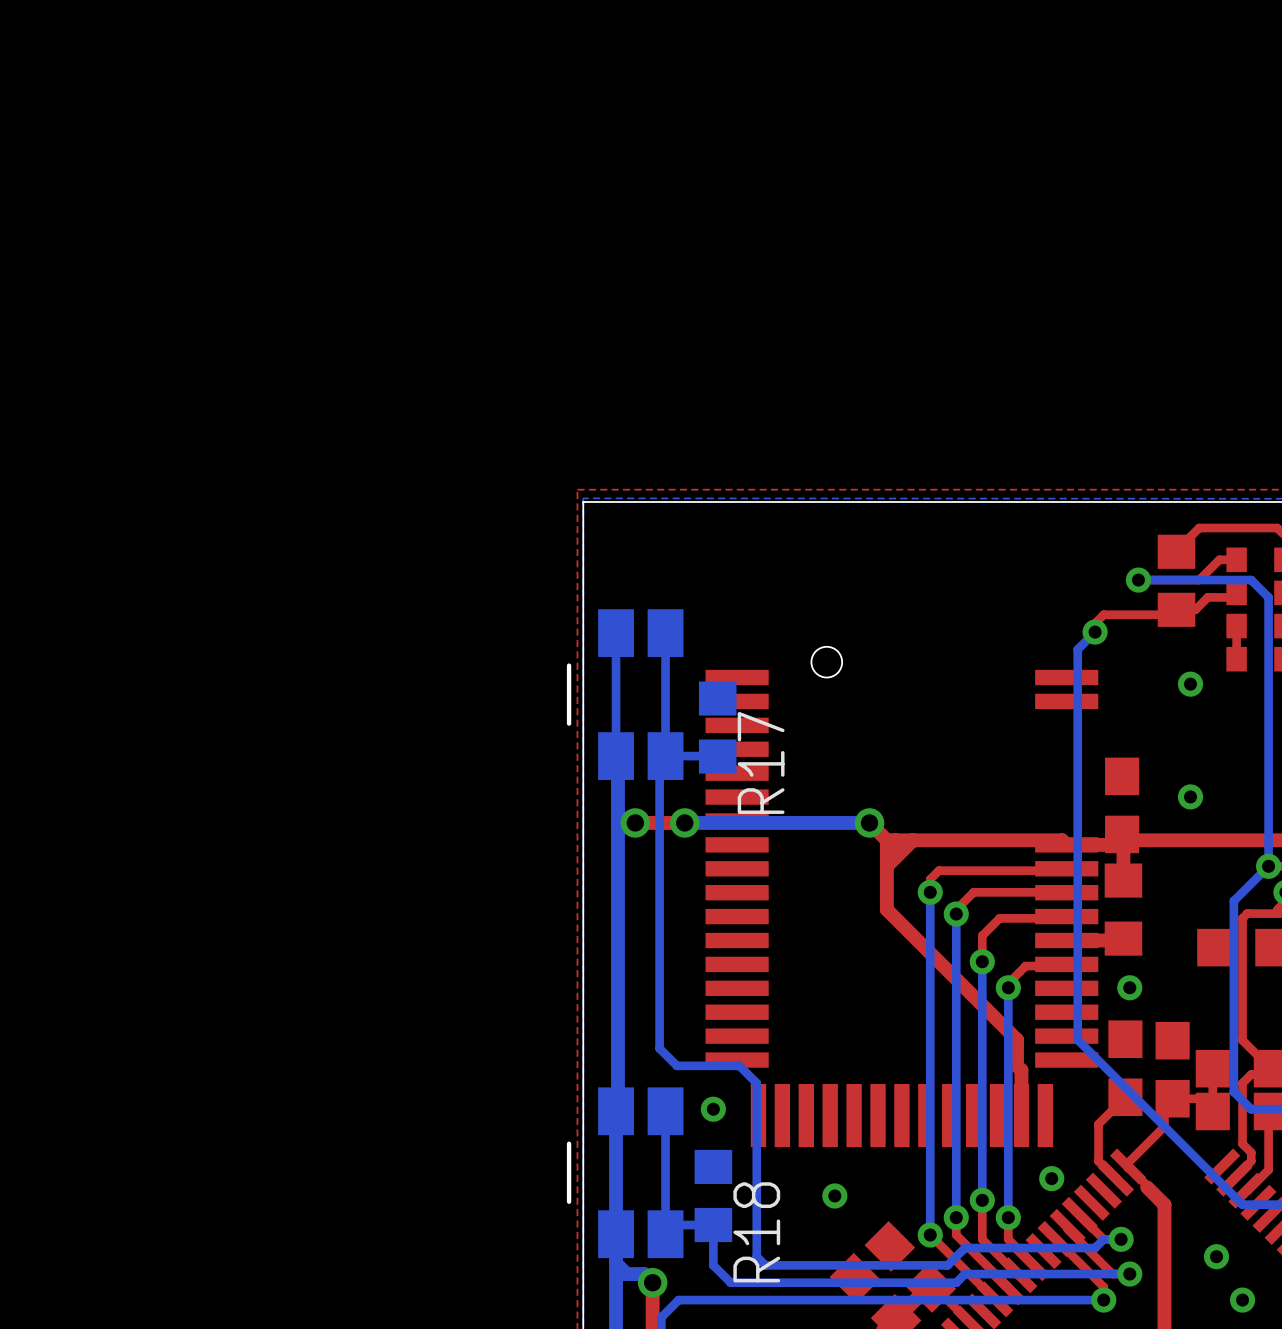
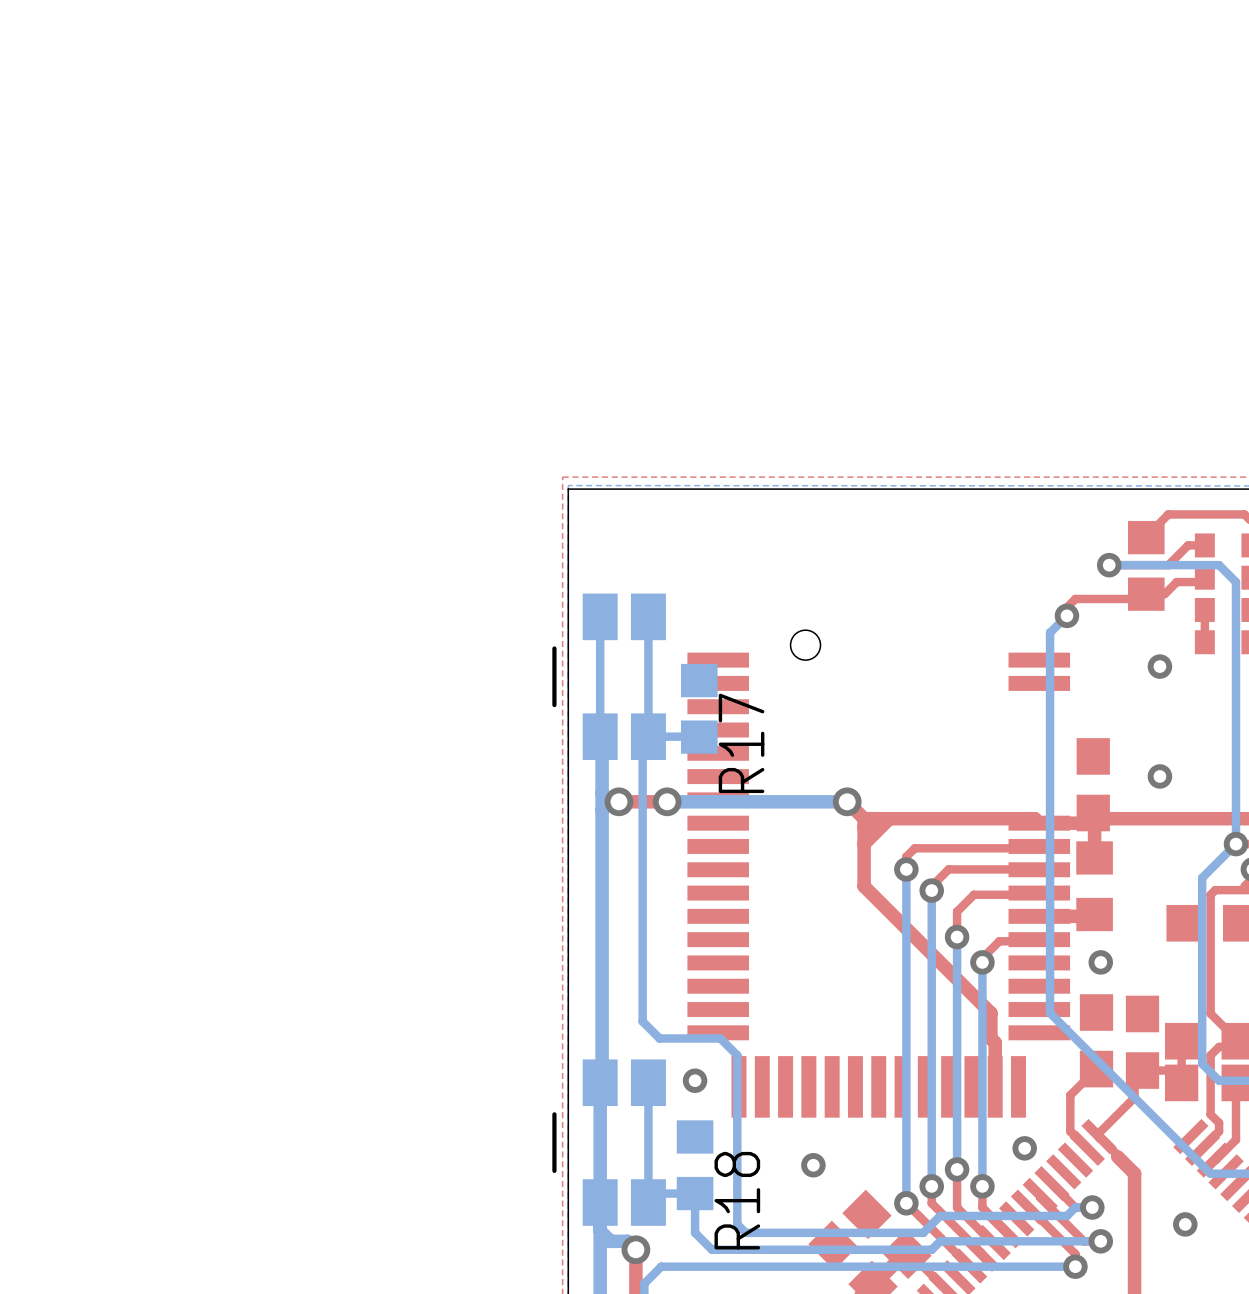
via: (1242, 1300) -> none

